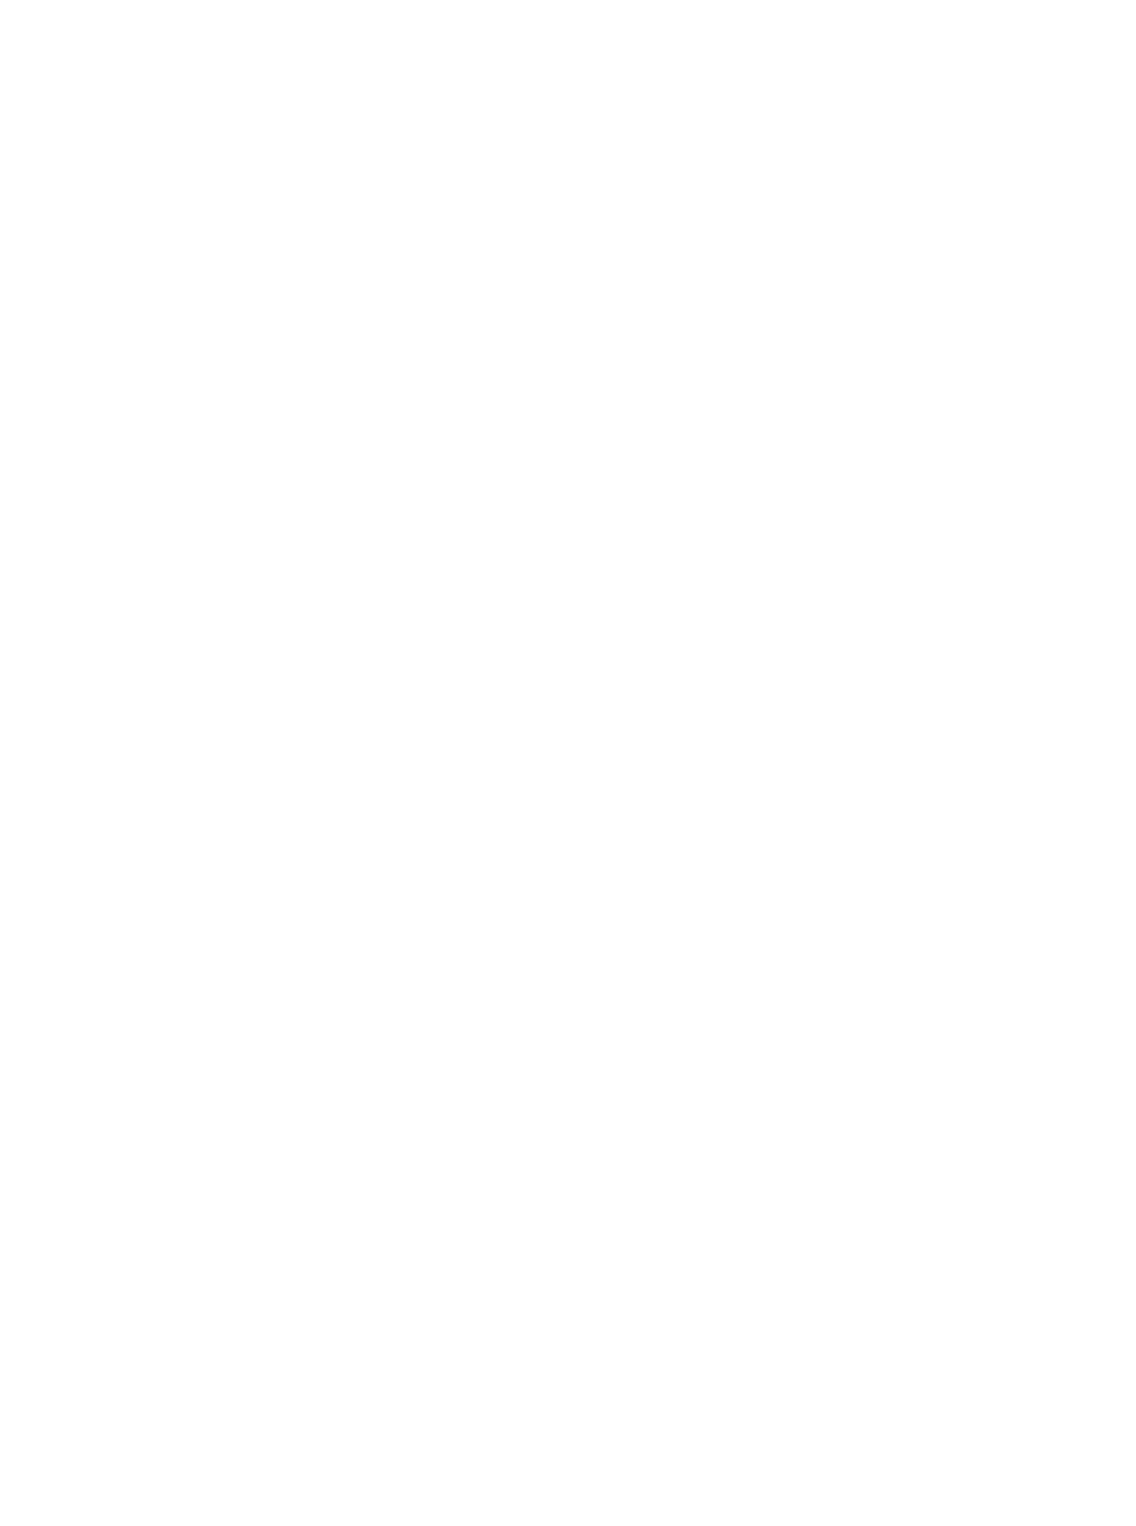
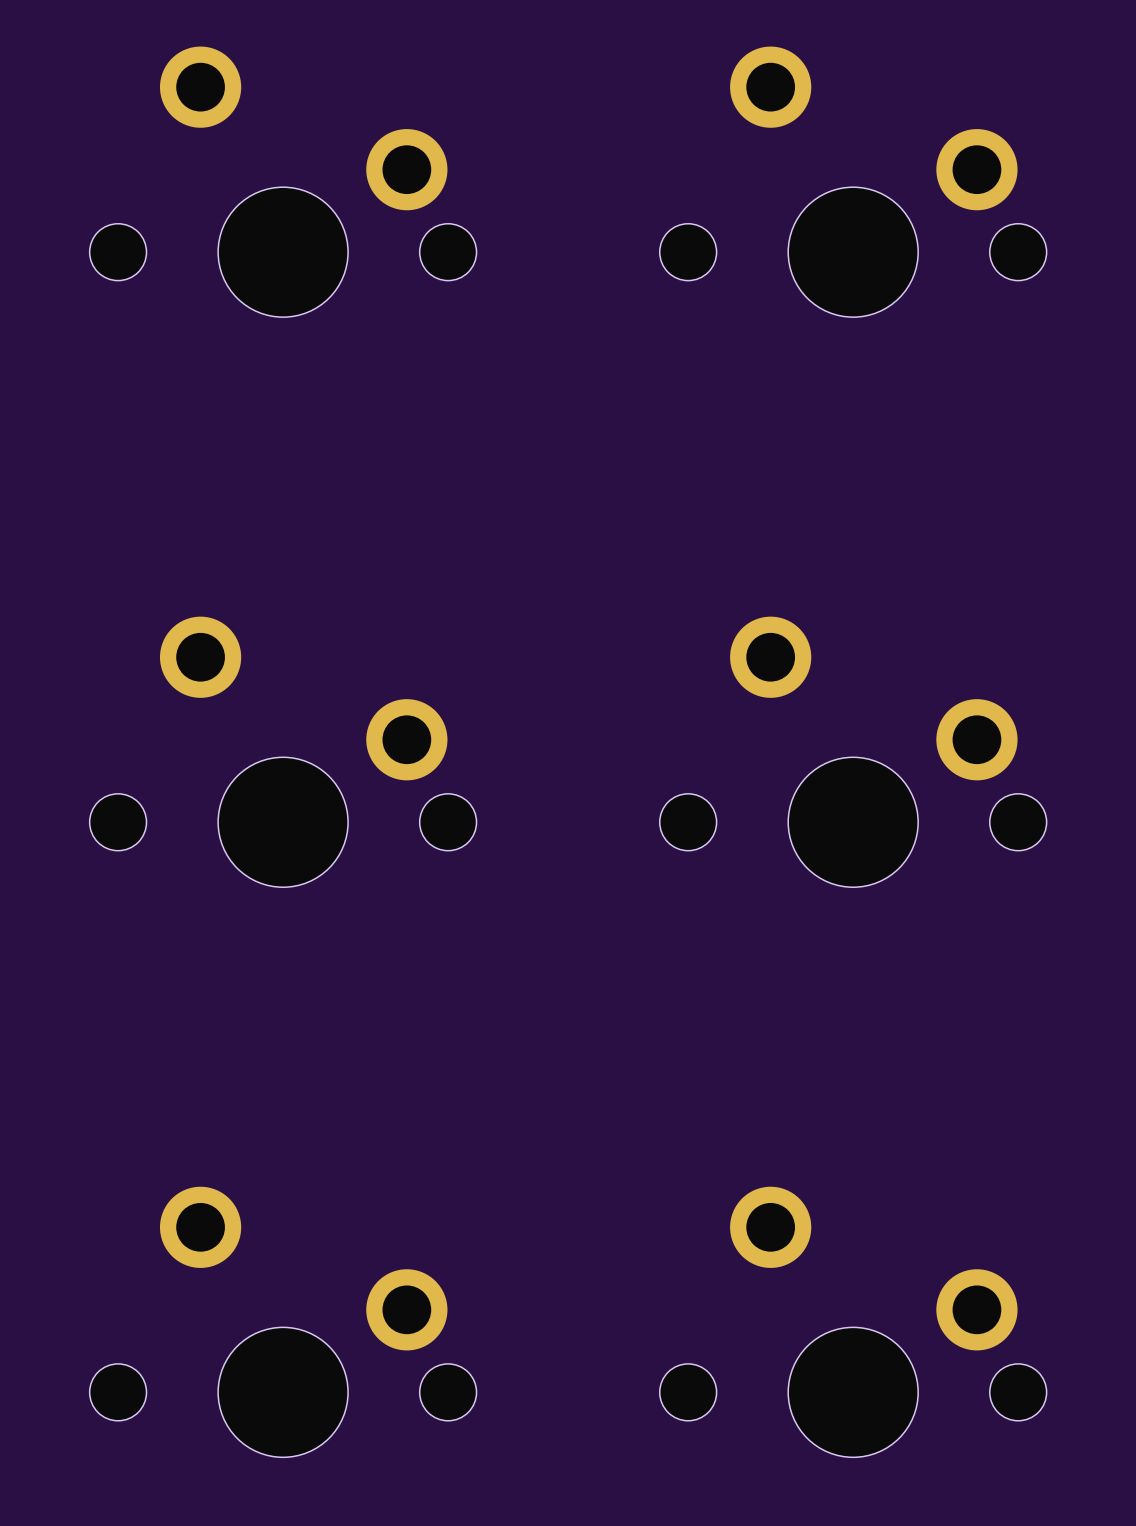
part: none -> (283, 181)
part: none -> (853, 181)
part: none -> (283, 751)
part: none -> (853, 751)
part: none -> (283, 1322)
part: none -> (853, 1322)

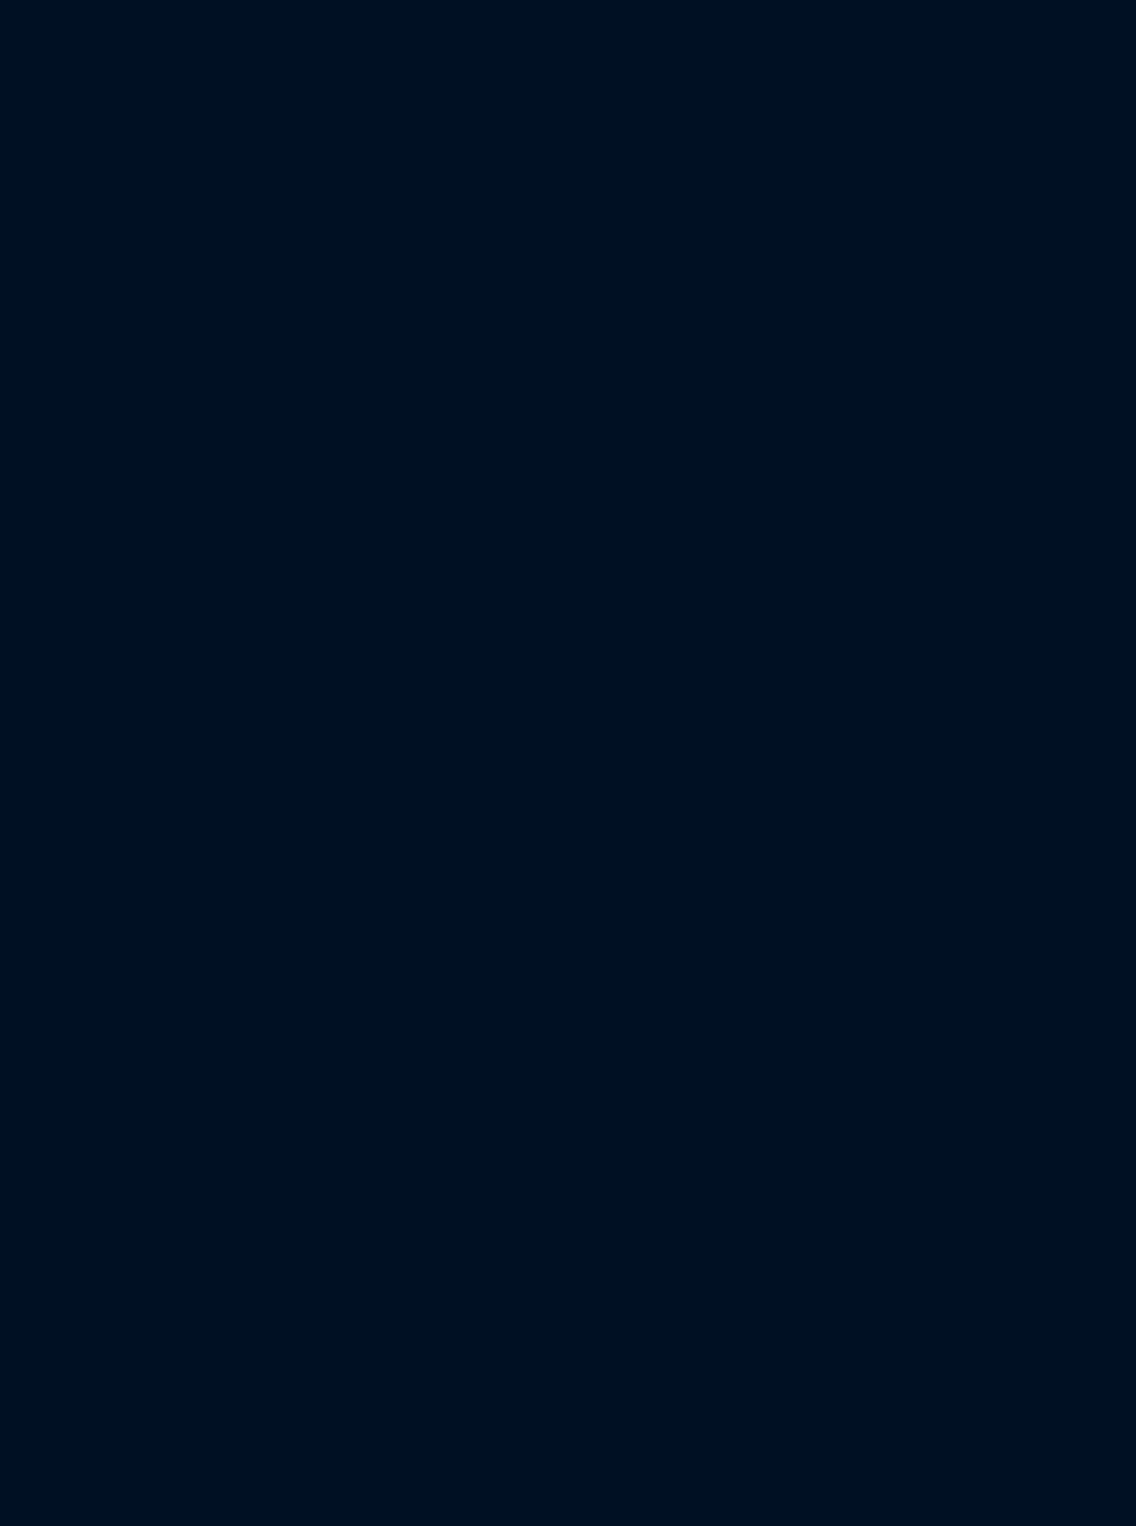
part: (283, 181) -> none
part: (853, 181) -> none
part: (283, 751) -> none
part: (853, 751) -> none
part: (283, 1322) -> none
part: (853, 1322) -> none

